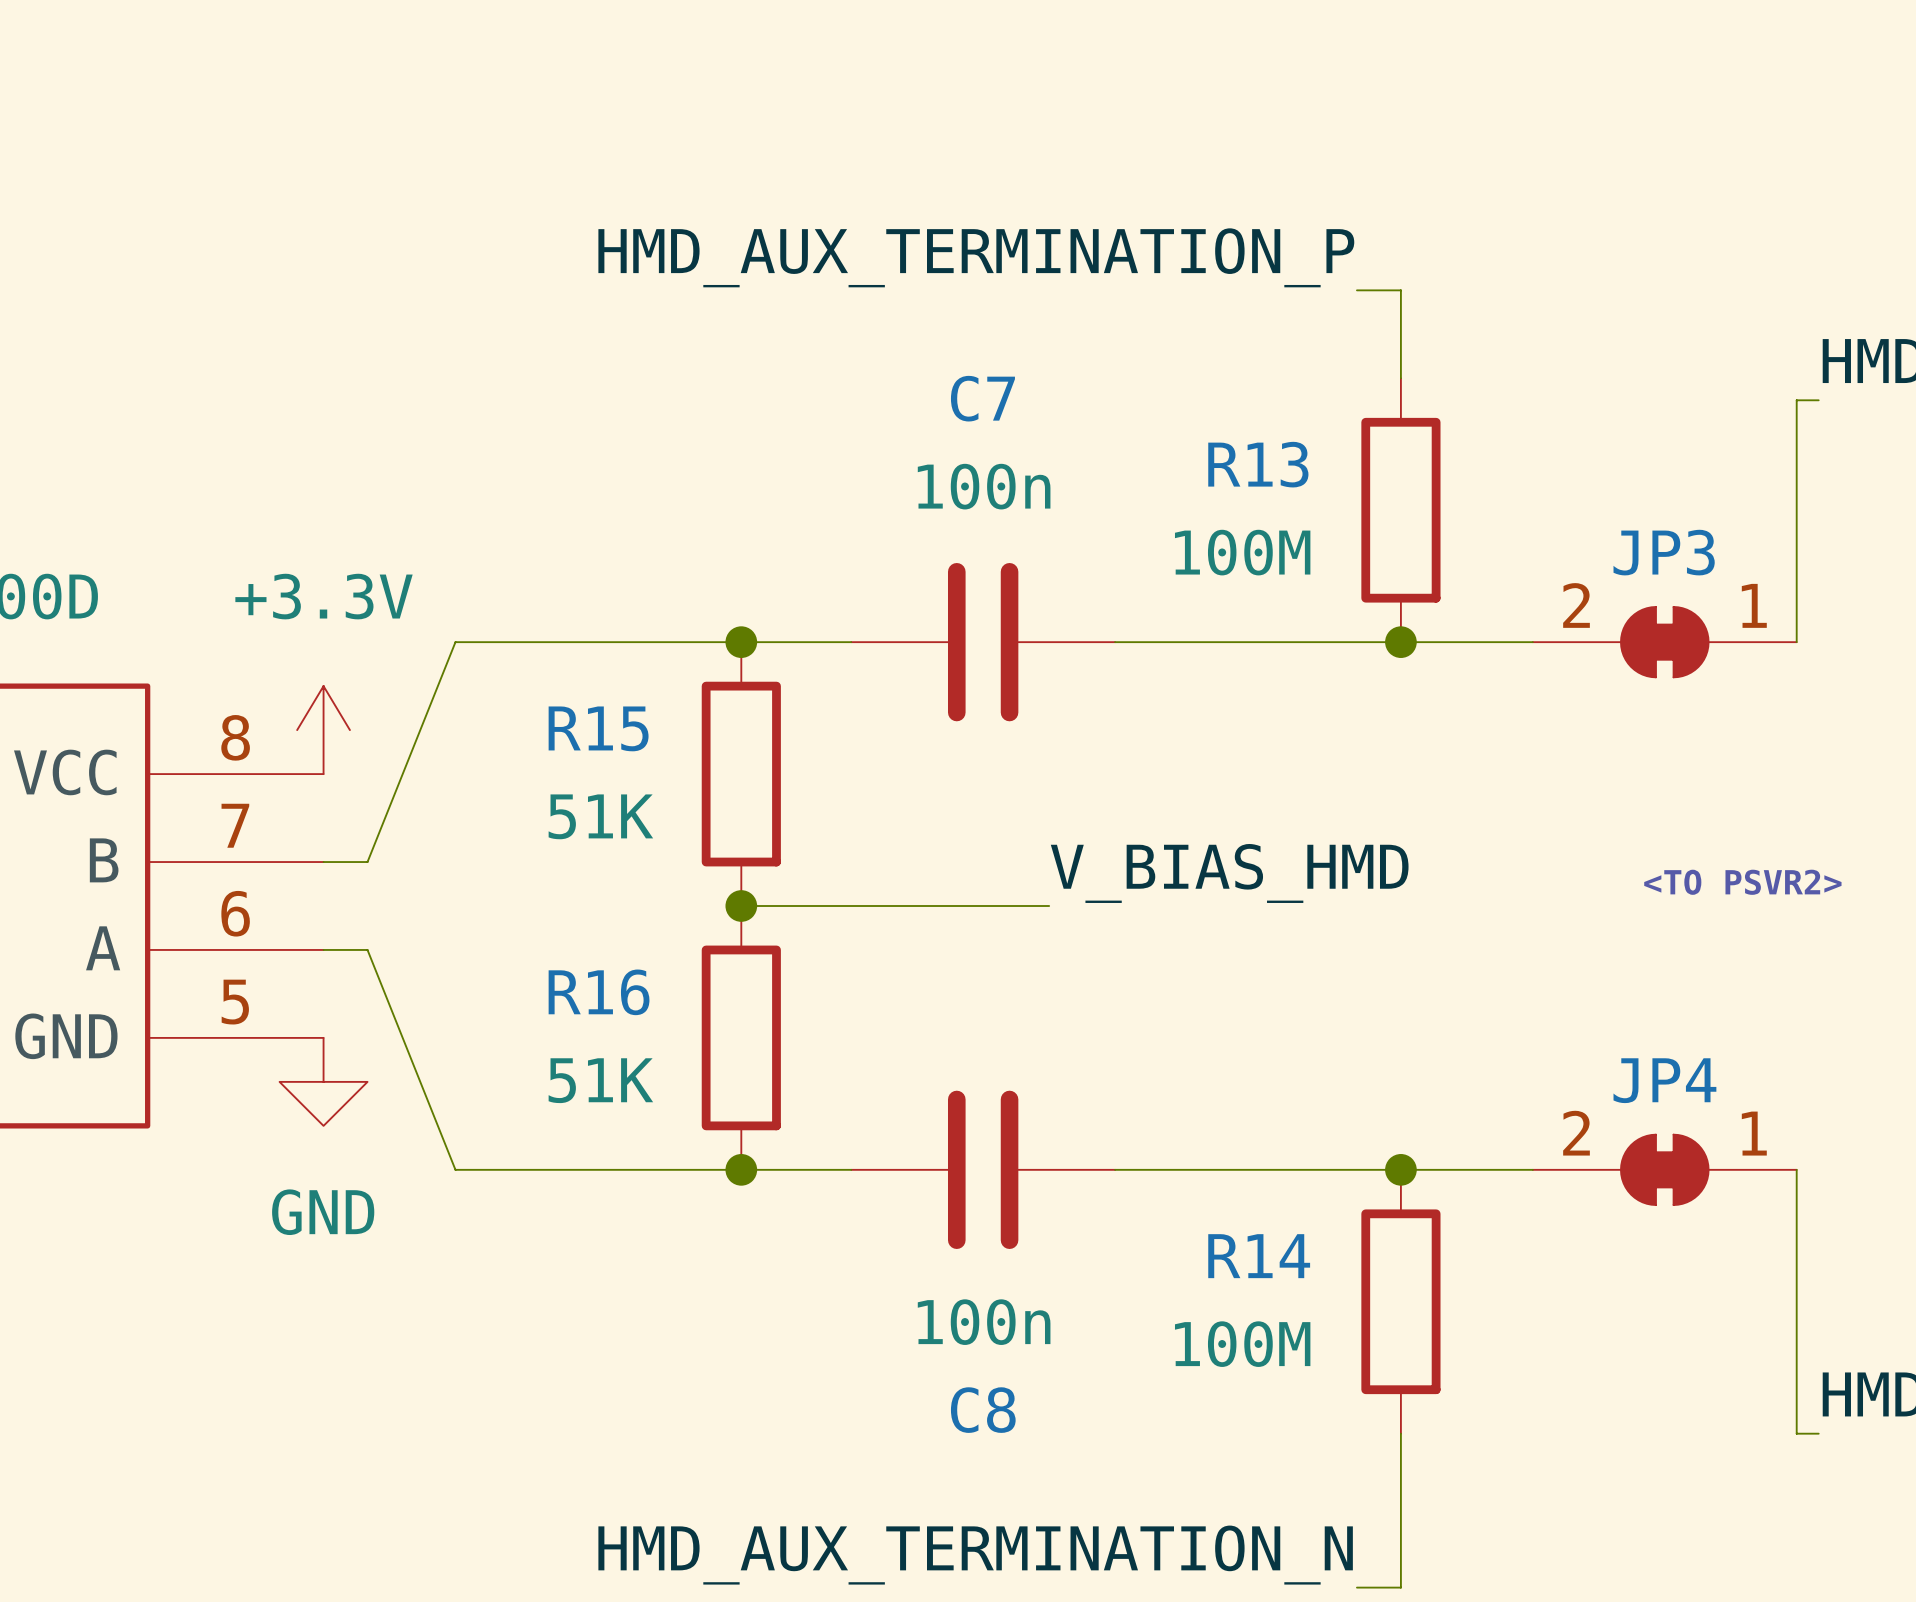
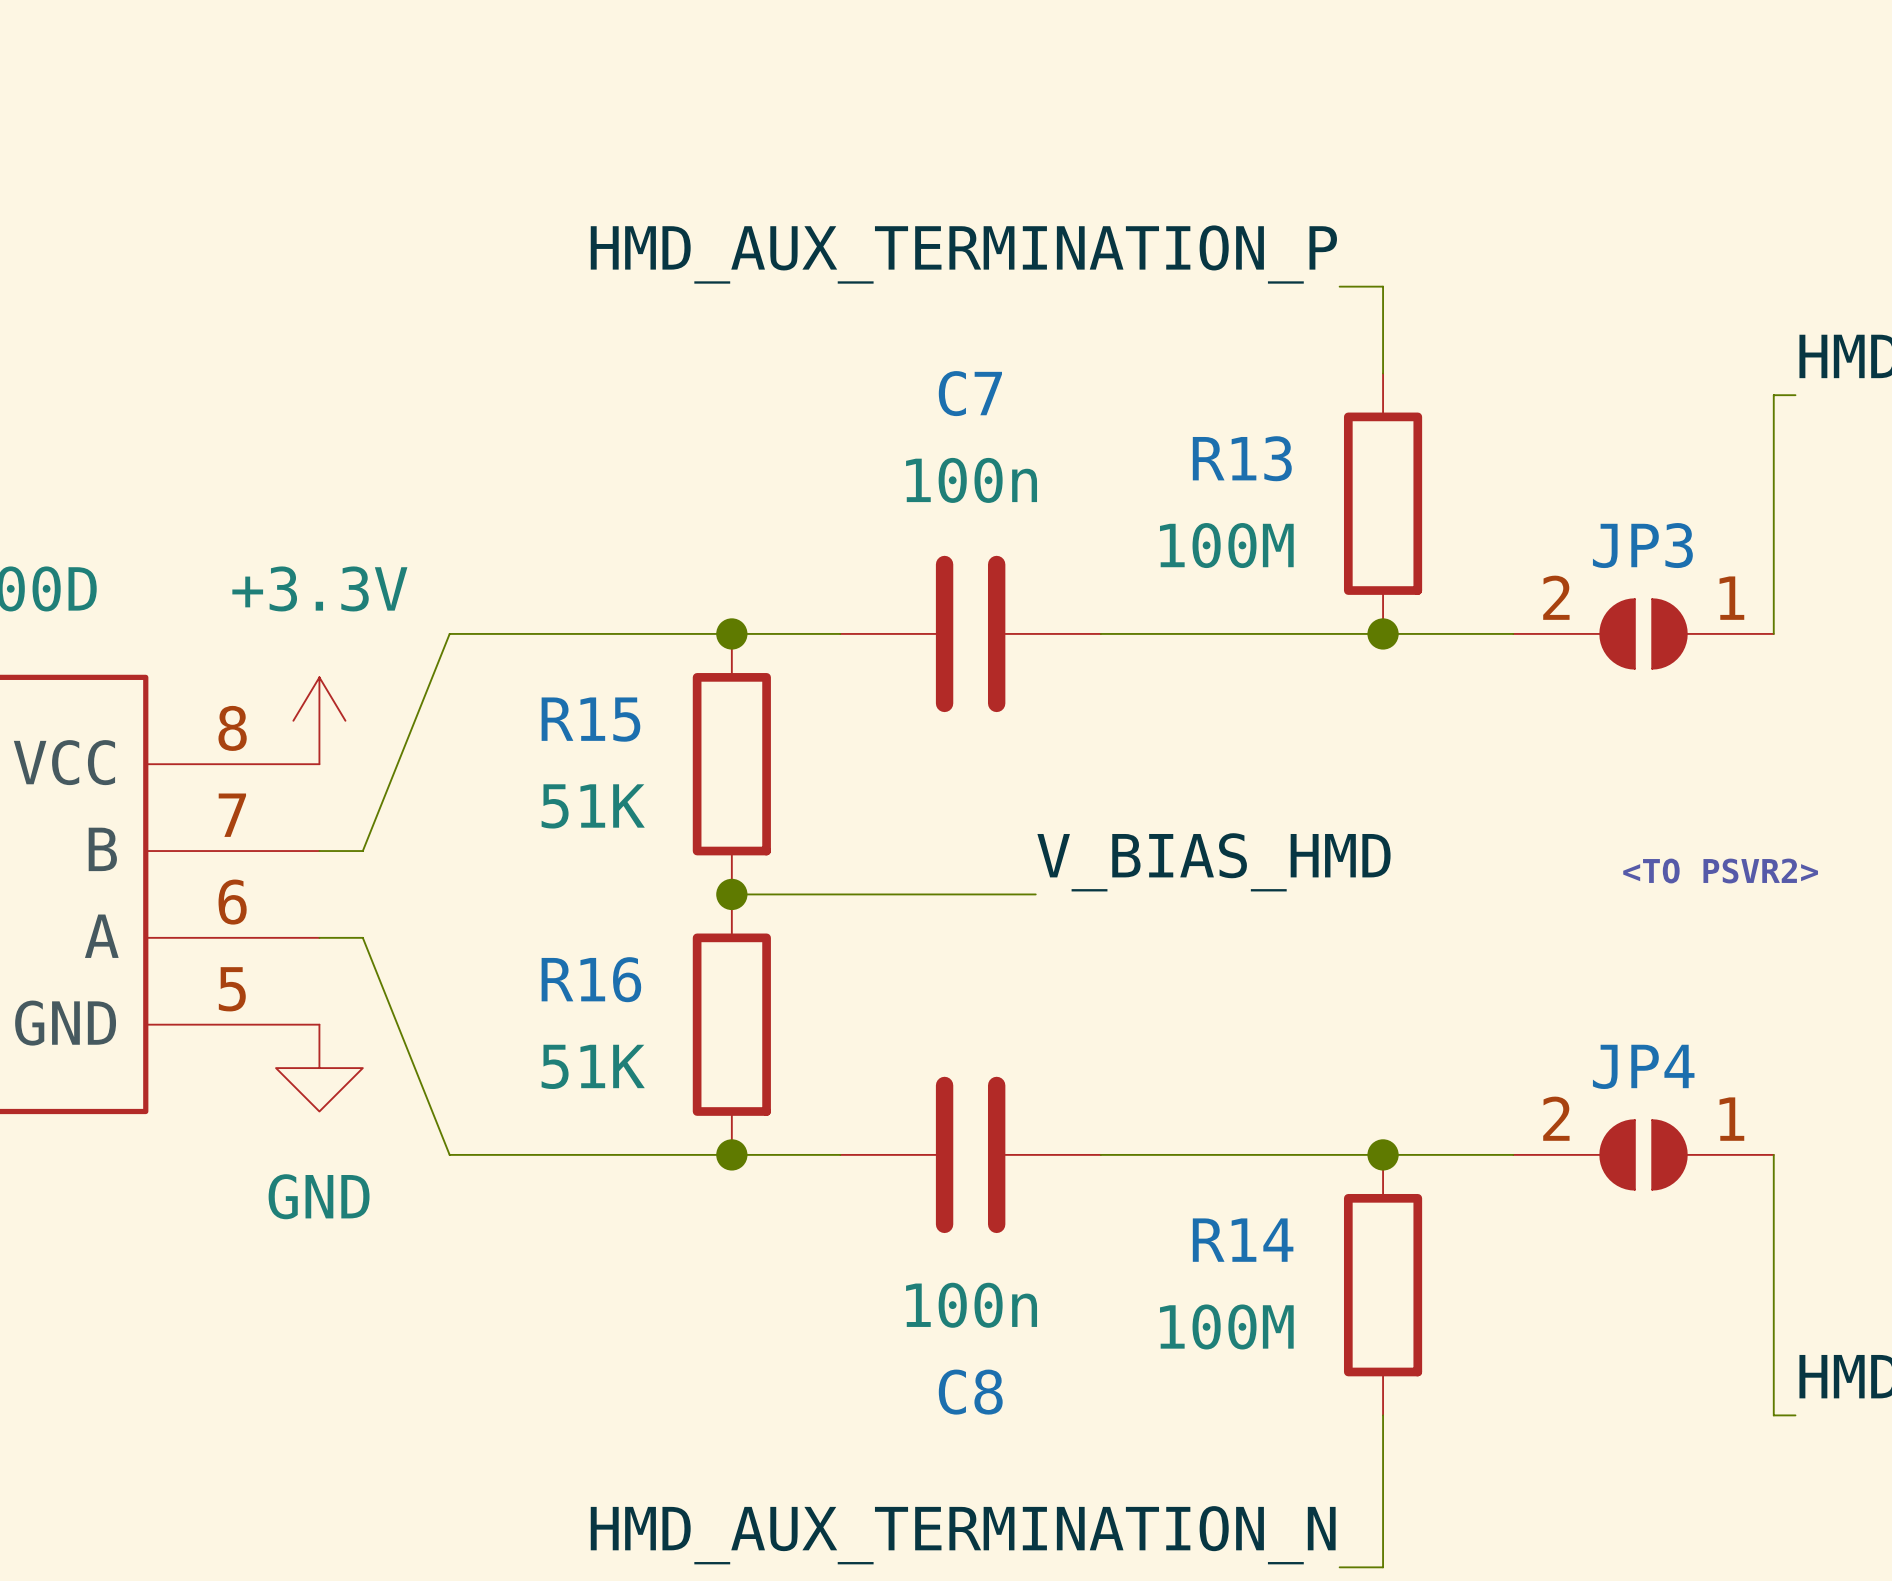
JP3 symbol: [1532, 606, 1797, 678] -> [1513, 599, 1774, 669]
JP4 symbol: [1532, 1134, 1797, 1206] -> [1513, 1120, 1774, 1190]

